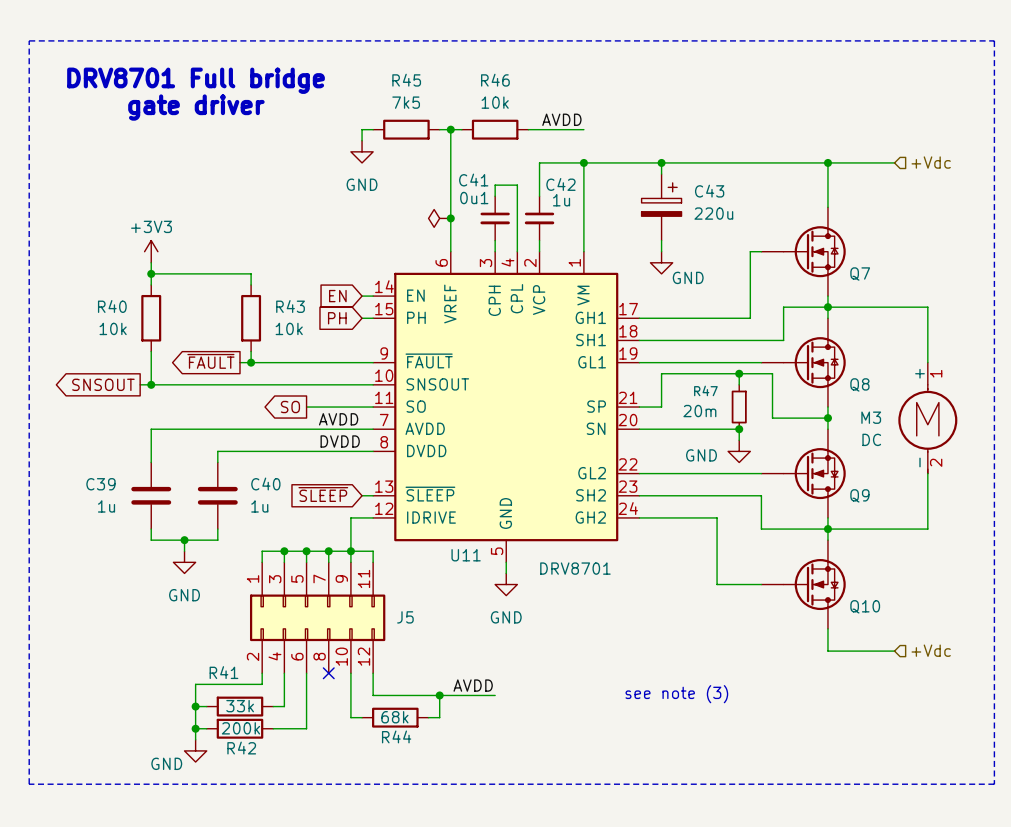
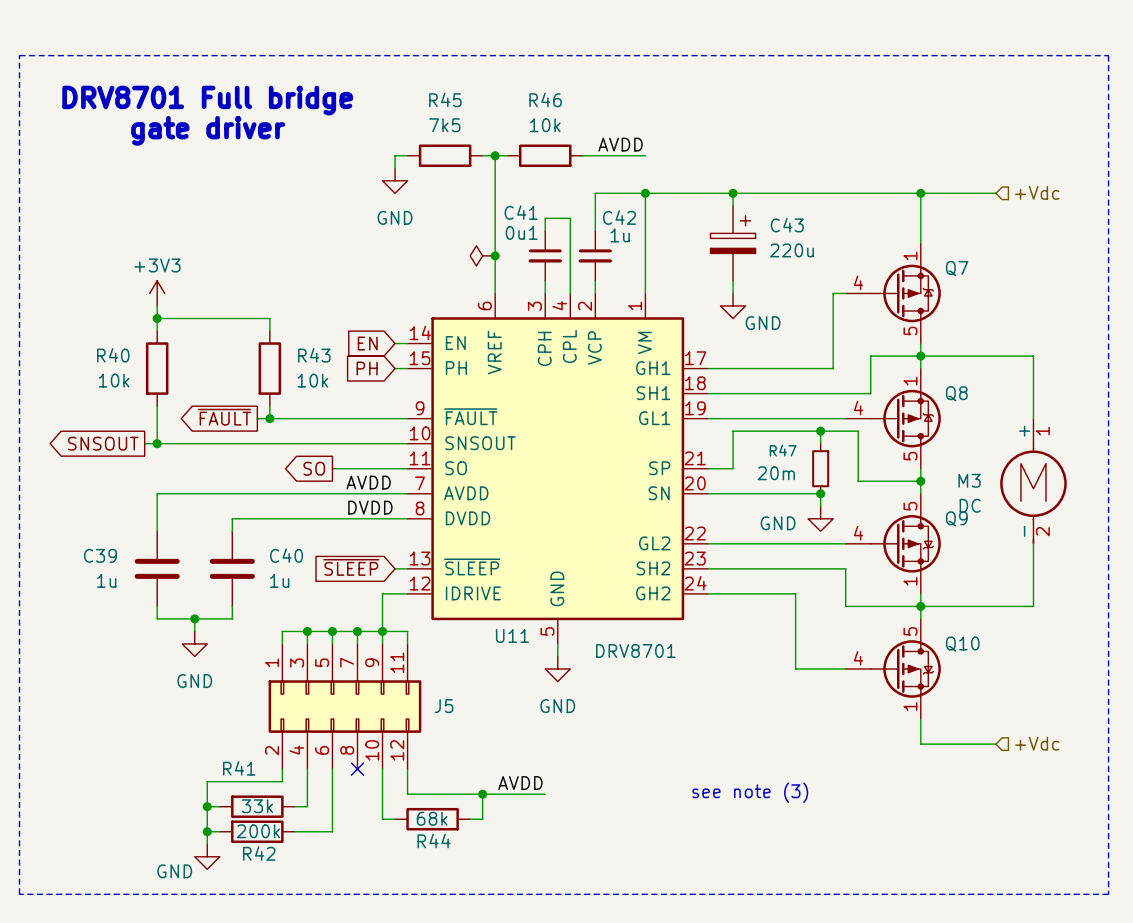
Q7 symbol: [761, 207, 846, 297] -> [845, 243, 941, 344]
Q7 name position: Q7 (860, 274) -> Q7 (957, 268)
Q8 symbol: [761, 318, 846, 408] -> [845, 368, 941, 469]
Q8 name position: Q8 (859, 384) -> Q8 (956, 393)
Q9 symbol: [761, 429, 846, 518] -> [845, 493, 941, 594]
Q9 name position: Q9 (859, 495) -> Q9 (956, 518)
Q10 symbol: [761, 540, 846, 629] -> [845, 618, 941, 720]
Q10 name position: Q10 (865, 606) -> Q10 (962, 644)

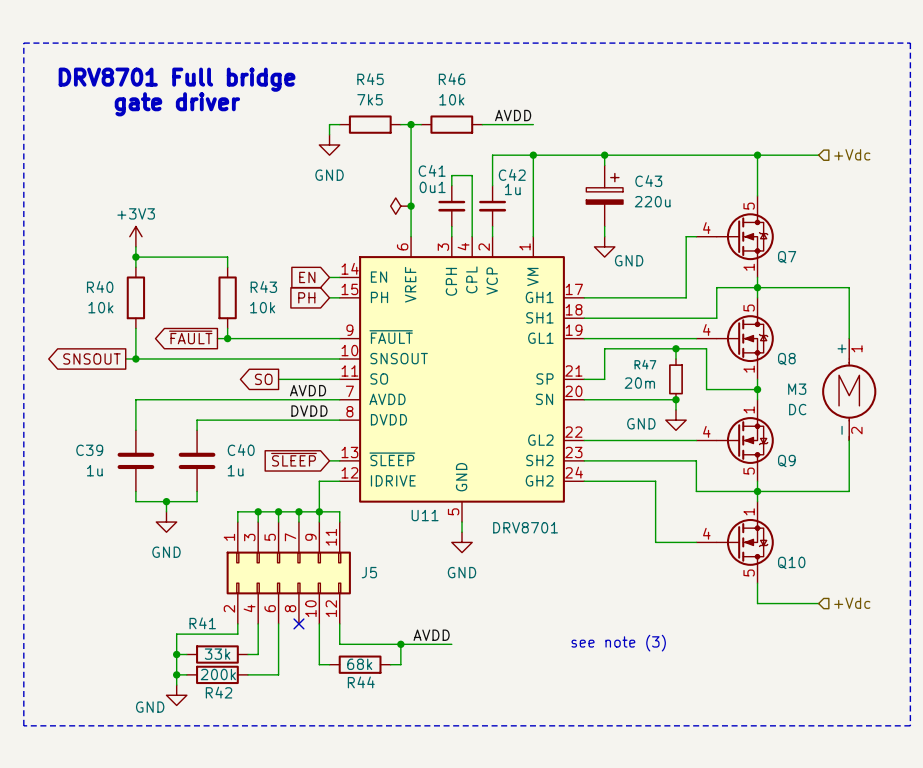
Q7 symbol: [845, 243, 941, 344] -> [696, 195, 774, 278]
Q7 name position: Q7 (957, 268) -> Q7 (787, 257)
Q8 symbol: [845, 368, 941, 469] -> [696, 297, 774, 380]
Q8 name position: Q8 (956, 393) -> Q8 (786, 359)
Q9 symbol: [845, 493, 941, 594] -> [696, 399, 774, 482]
Q9 name position: Q9 (956, 518) -> Q9 (786, 460)
Q10 symbol: [845, 618, 941, 720] -> [696, 501, 774, 584]
Q10 name position: Q10 (962, 644) -> Q10 (791, 562)

